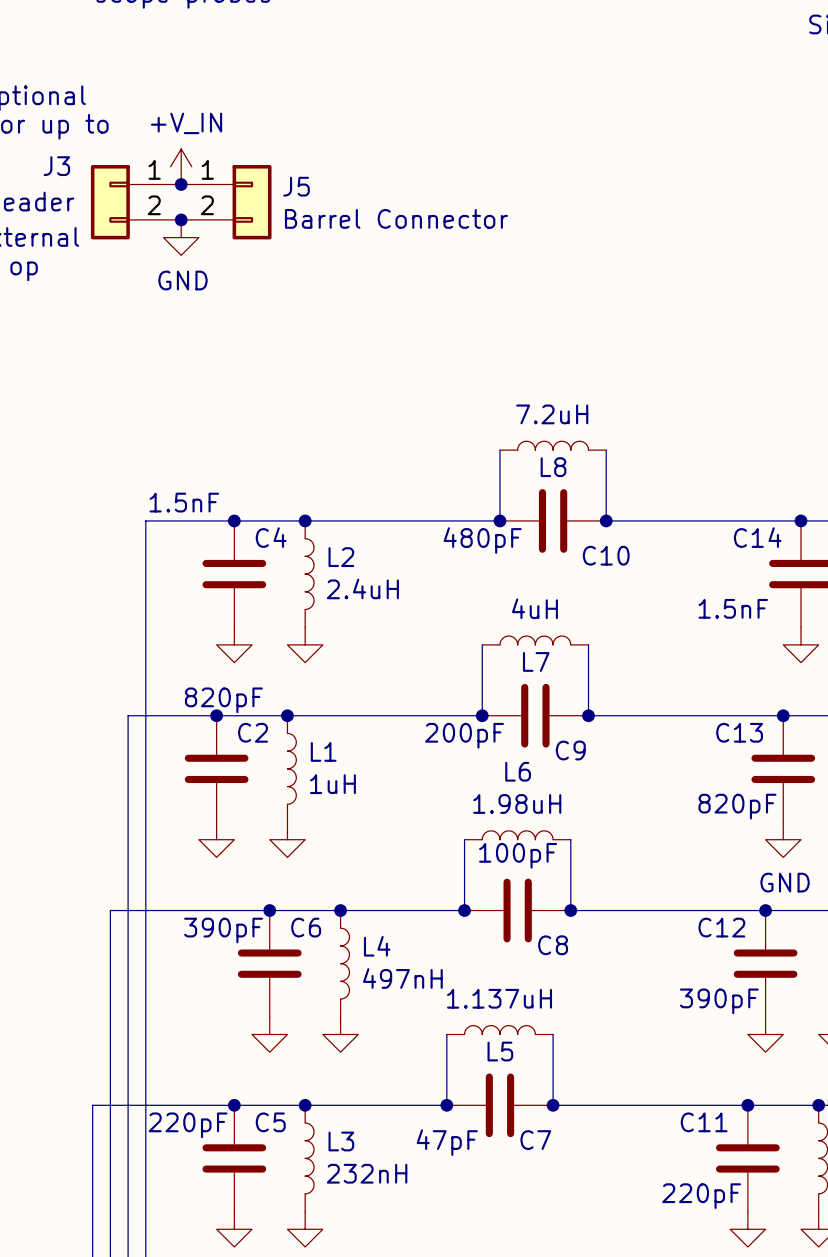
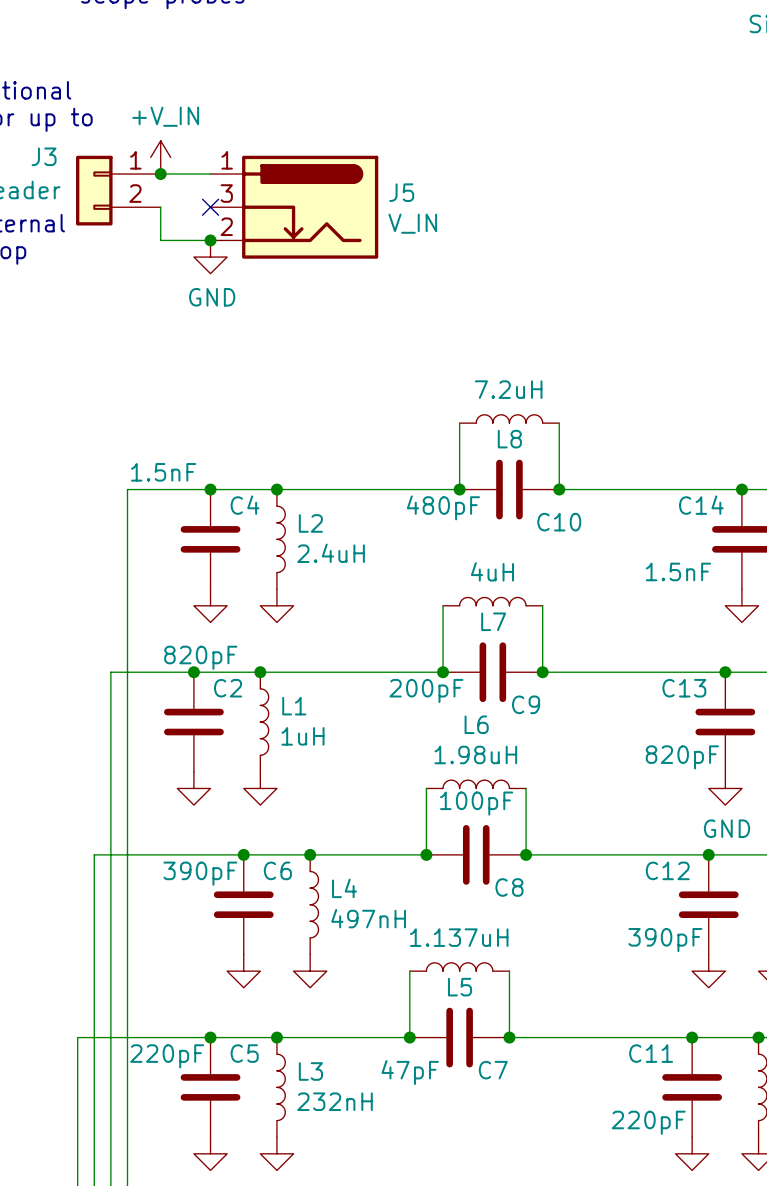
J5 symbol: [181, 165, 272, 240] -> [210, 155, 379, 259]
J5 name position: J5 (296, 186) -> J5 (401, 192)
J5 value: Barrel Connector (396, 218) -> V_IN (412, 223)
wire: none -> (160, 207) (160, 240) (210, 240)
junction position: (181, 219) -> (210, 240)
no-connect mark: none -> (210, 207)
power symbol position: GND (181, 237) -> GND (210, 257)

